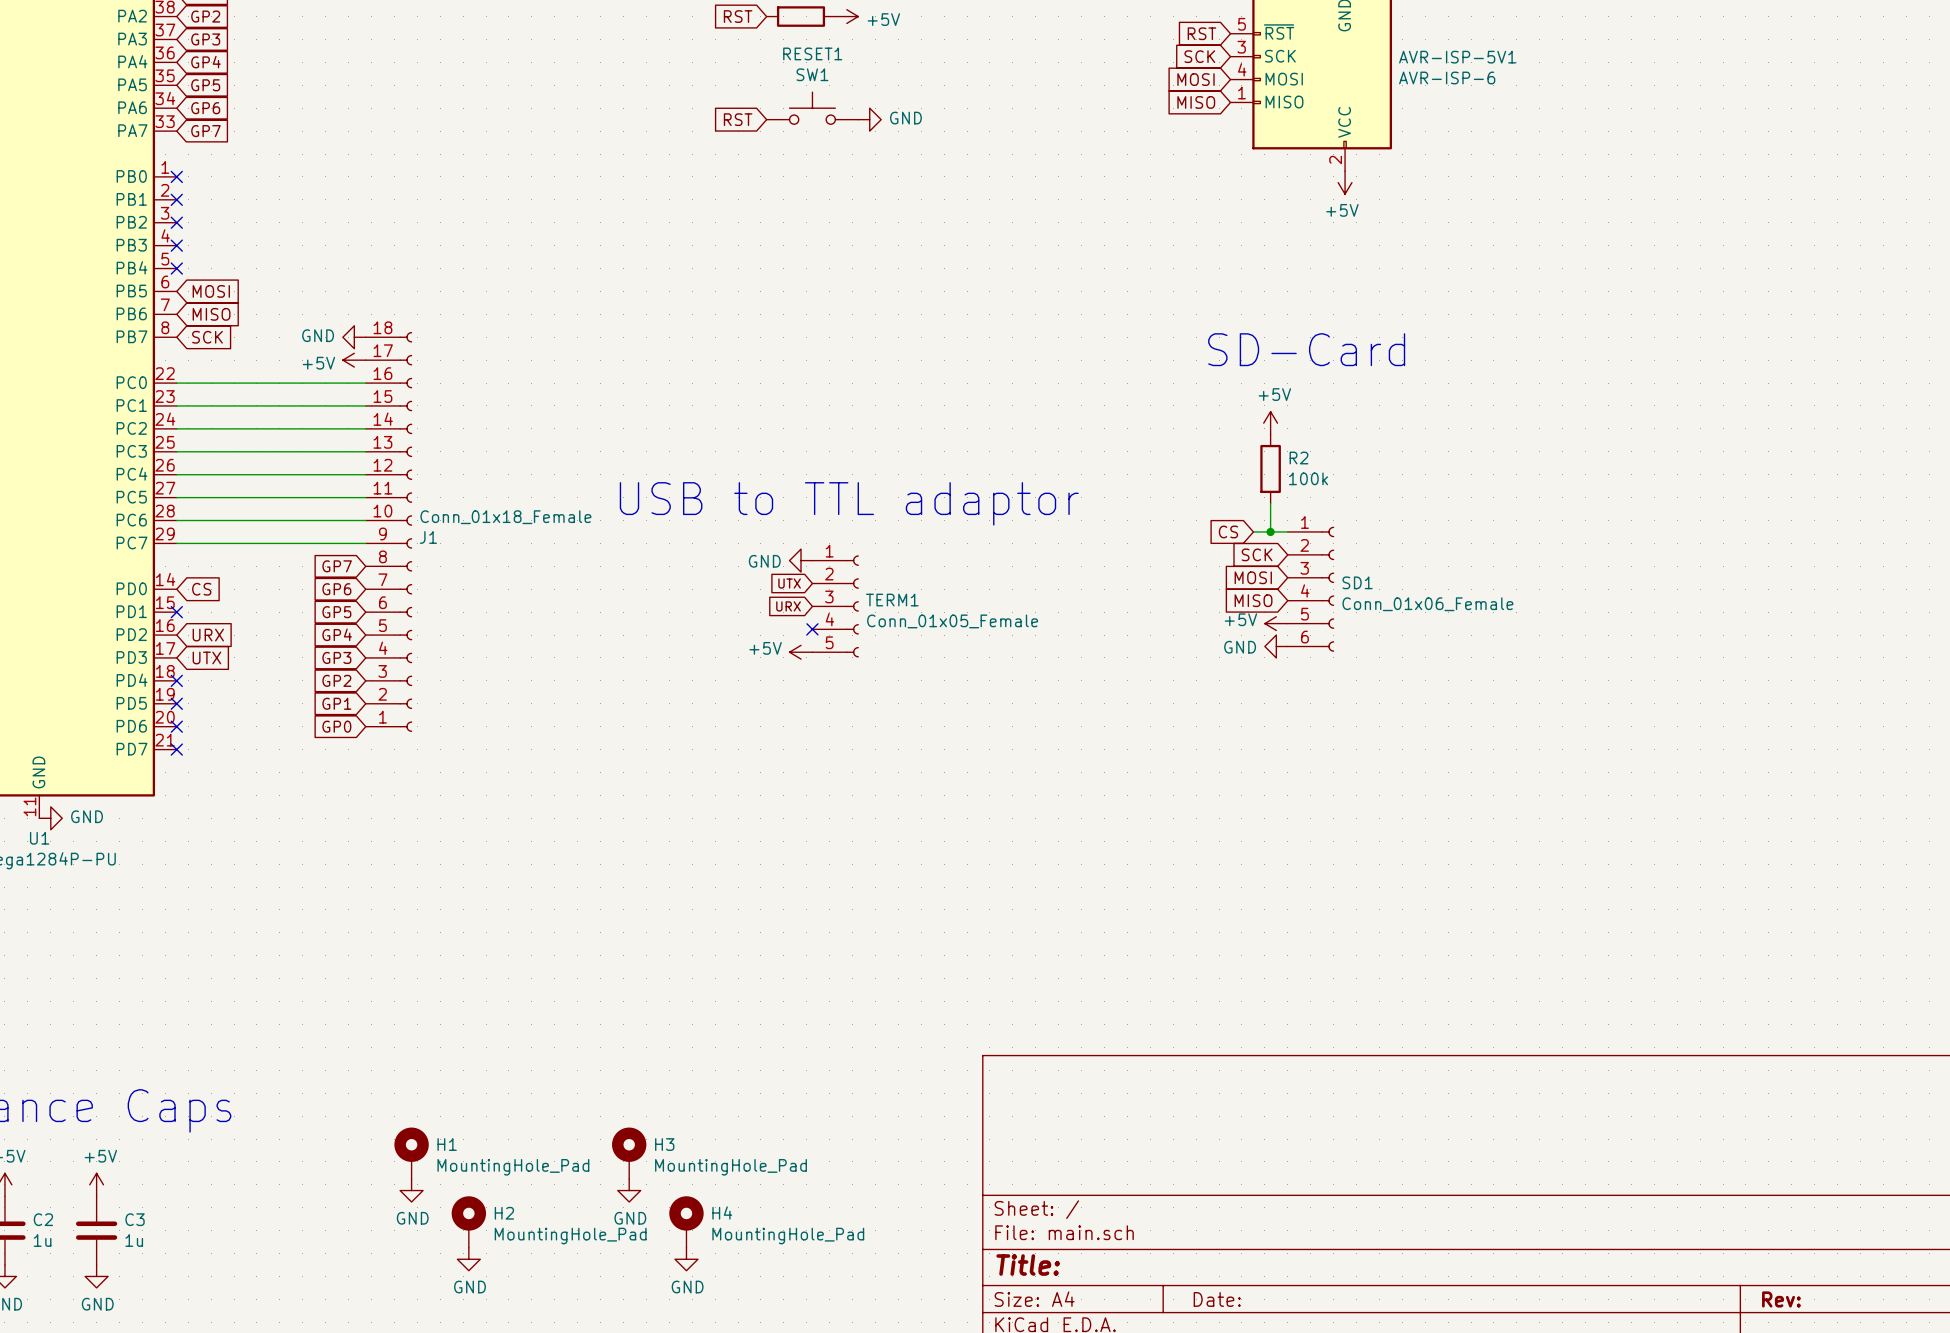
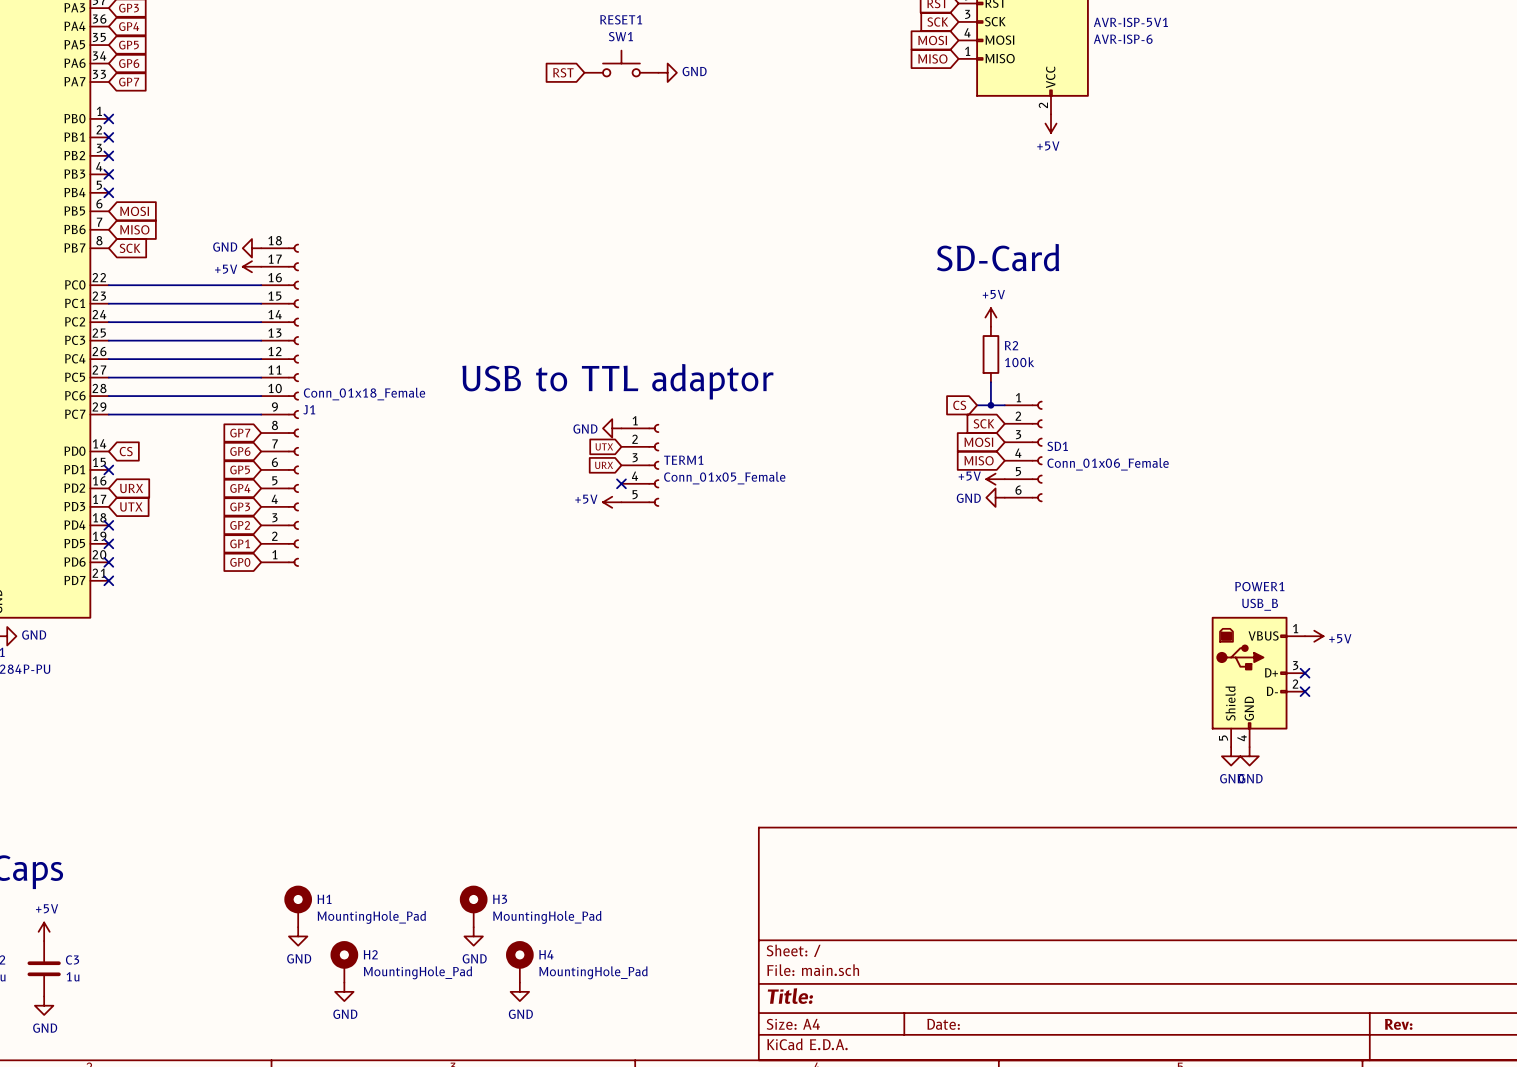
power symbol: none -> +5V (1314, 636)
no-connect mark: none -> (1305, 673)
POWER1: none -> USB_B (1258, 681)
no-connect mark: none -> (1305, 691)
power symbol: none -> GND (1231, 756)
power symbol: none -> GND (1249, 756)

